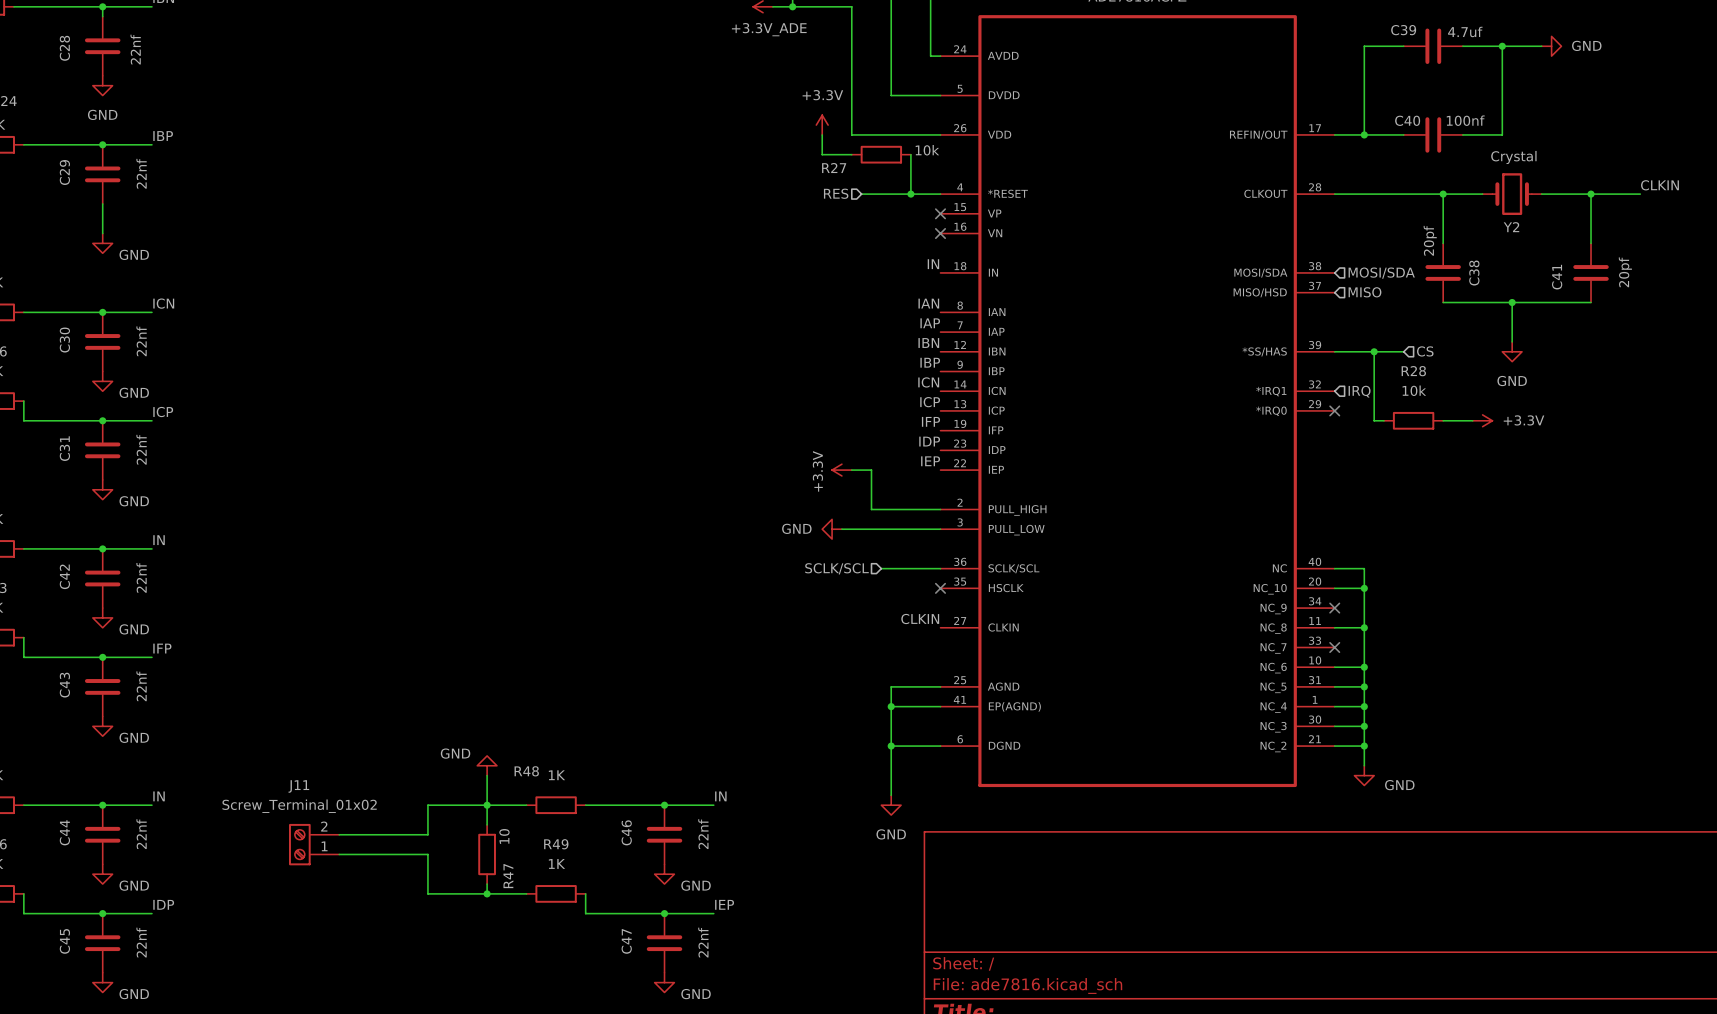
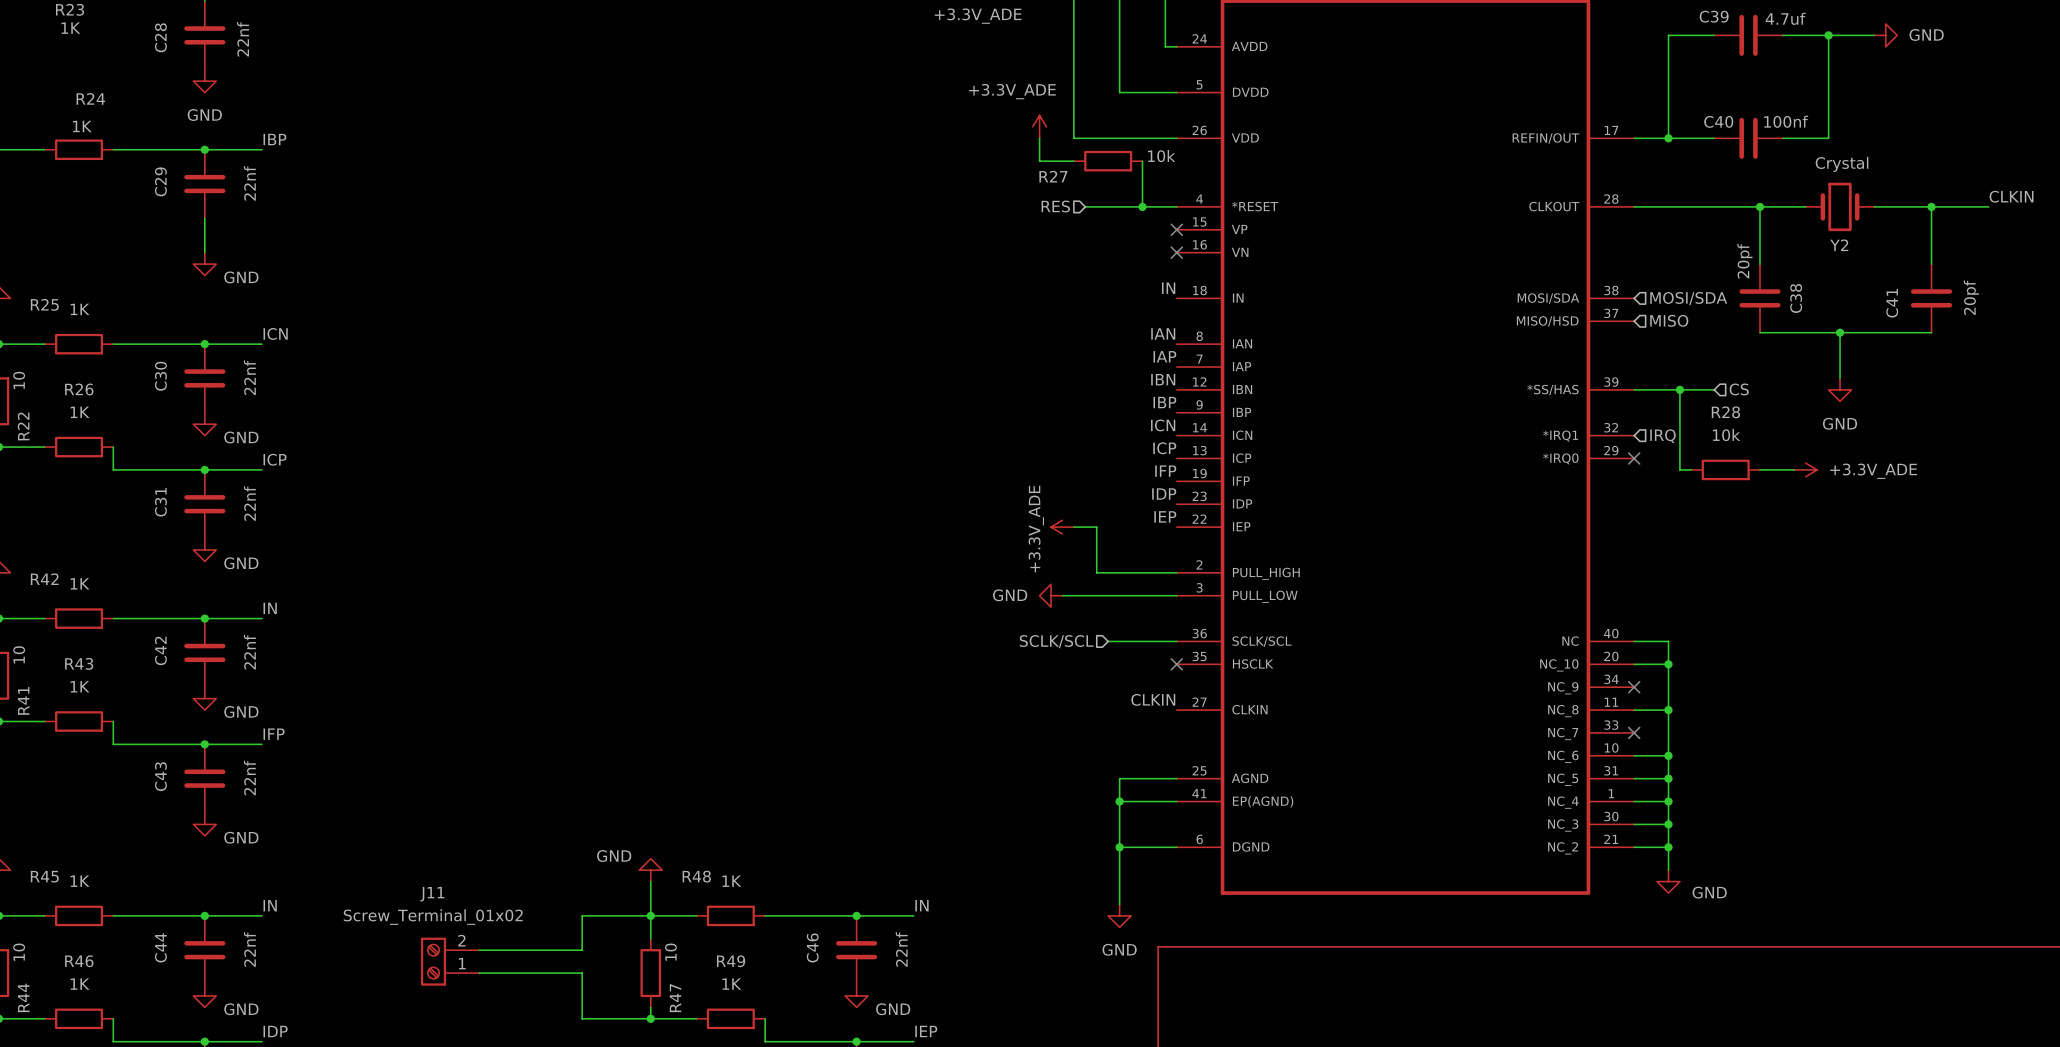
power symbol: +3.3V (822, 125) -> +3.3V_ADE (1039, 126)
power symbol: +3.3V (1482, 420) -> +3.3V_ADE (1805, 469)
power symbol: +3.3V (841, 470) -> +3.3V_ADE (1062, 527)

